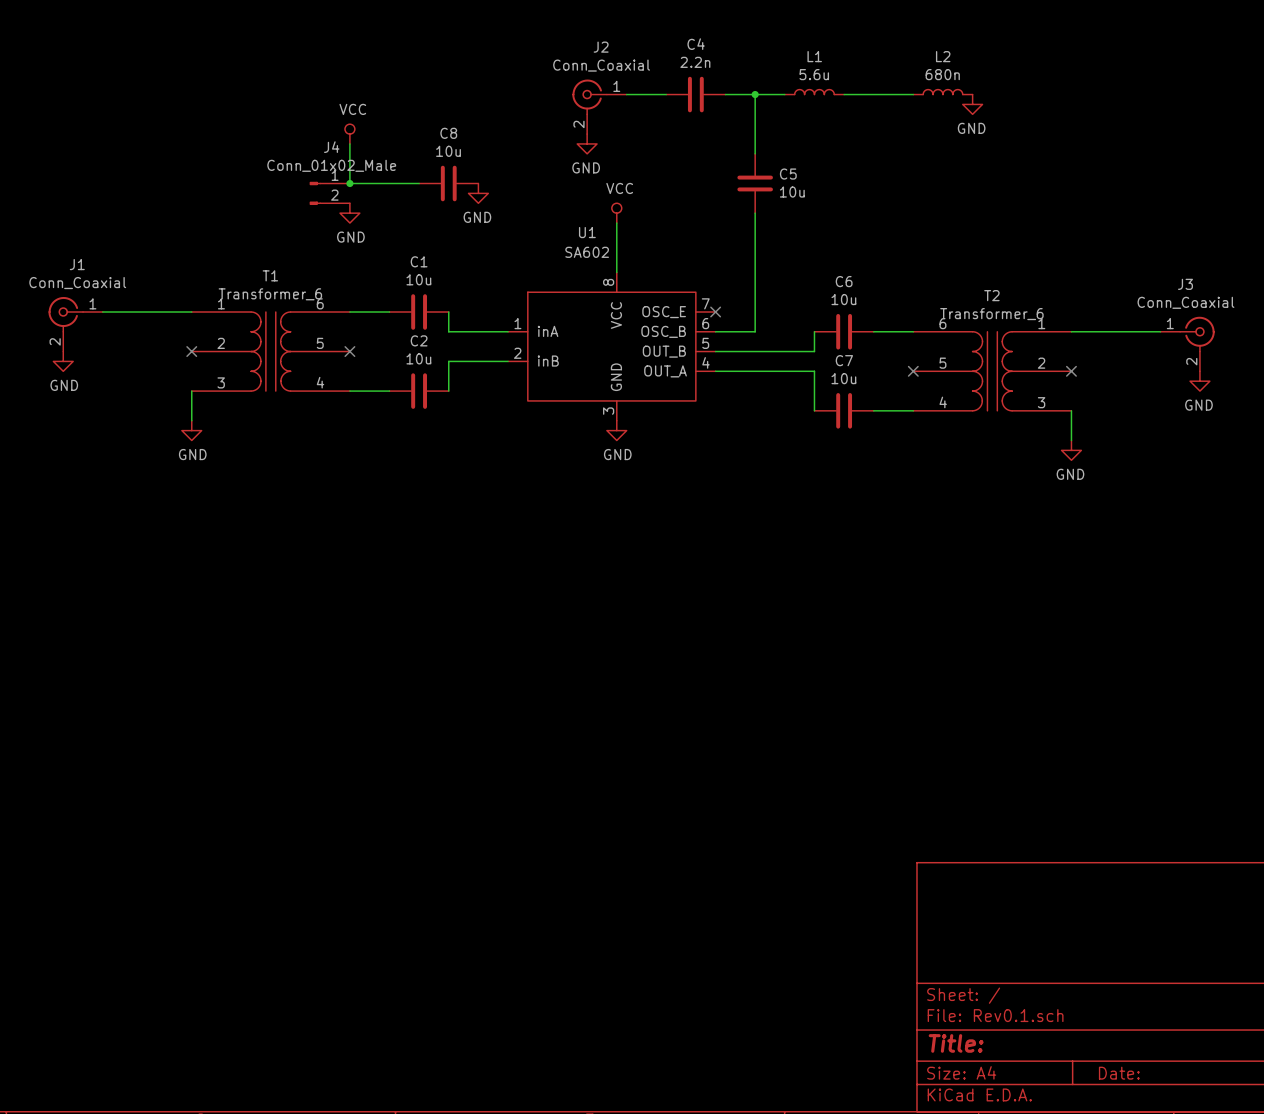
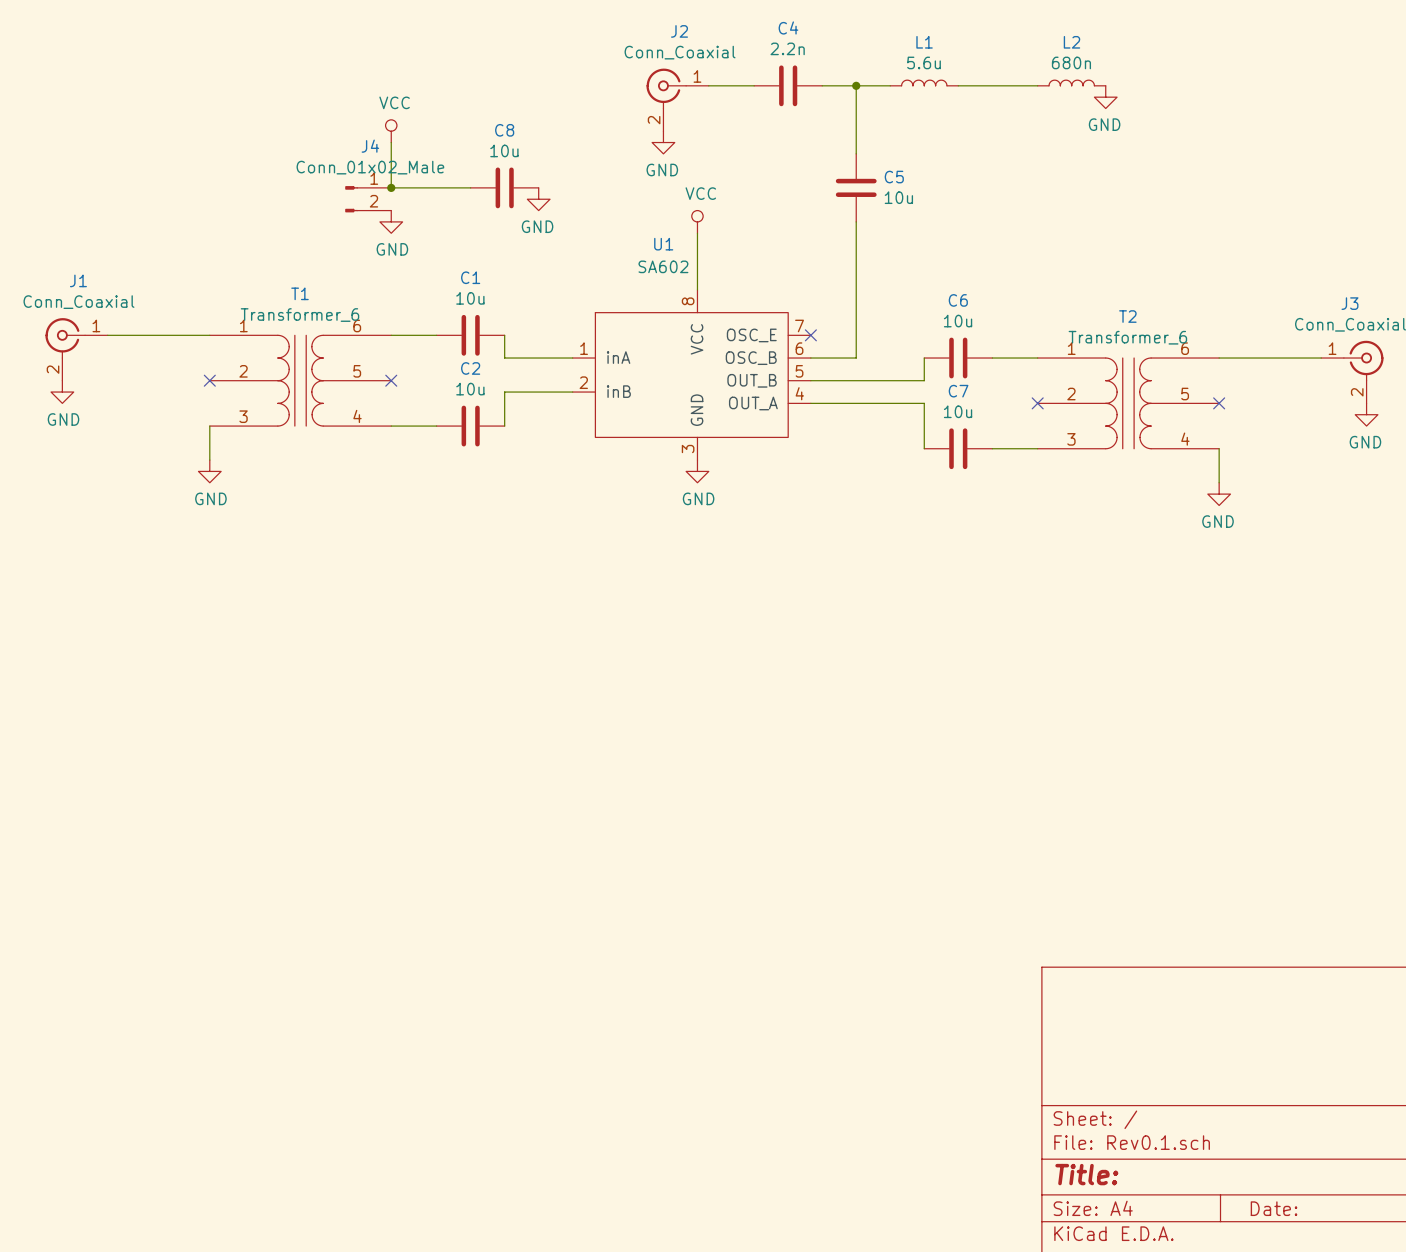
T2 flip: as is (992, 371) -> left-right (1128, 403)

